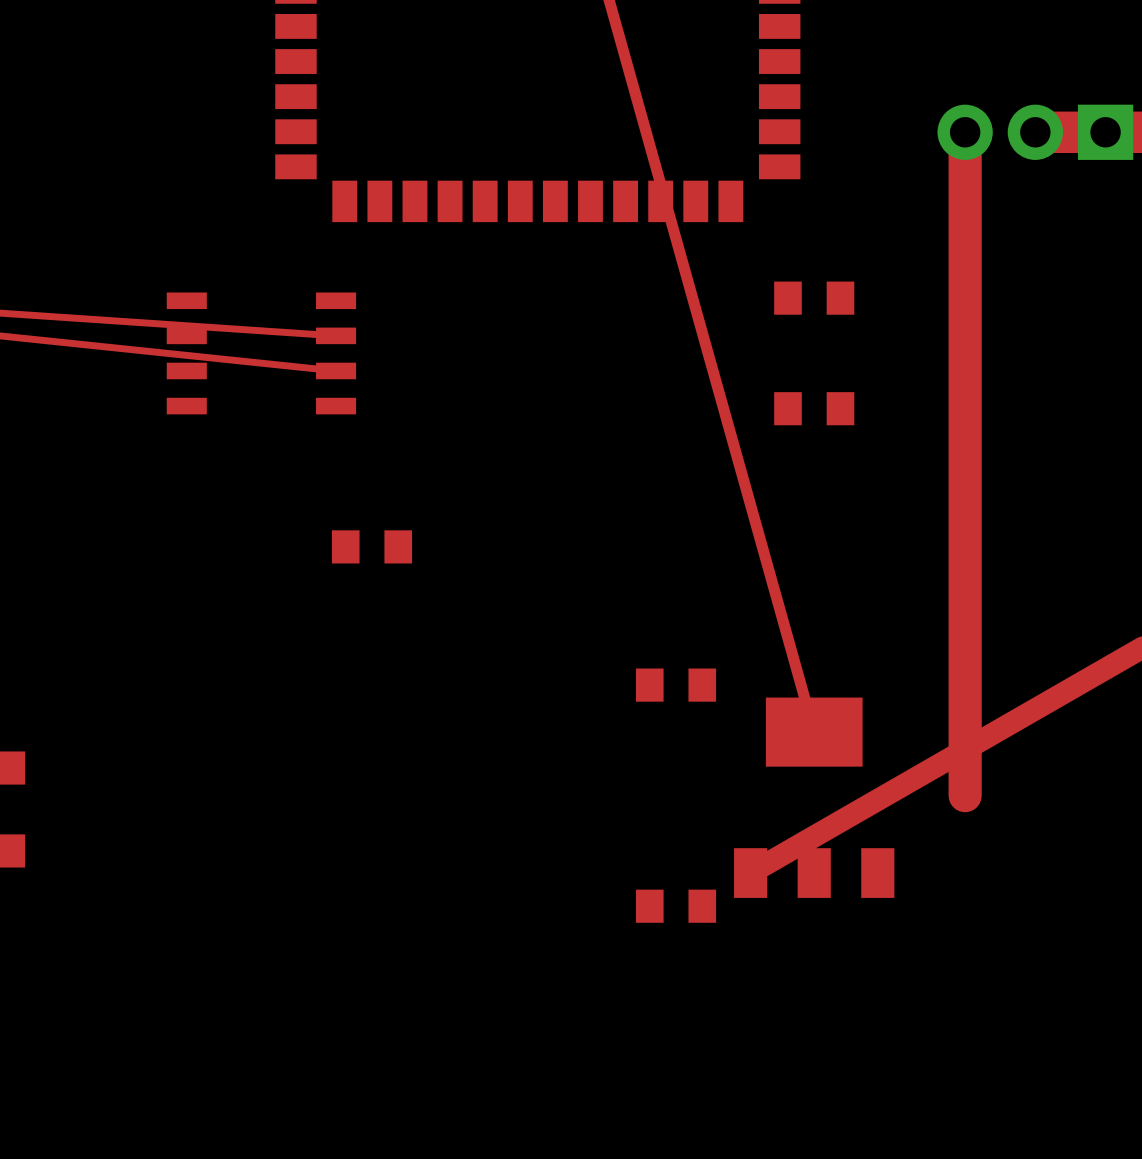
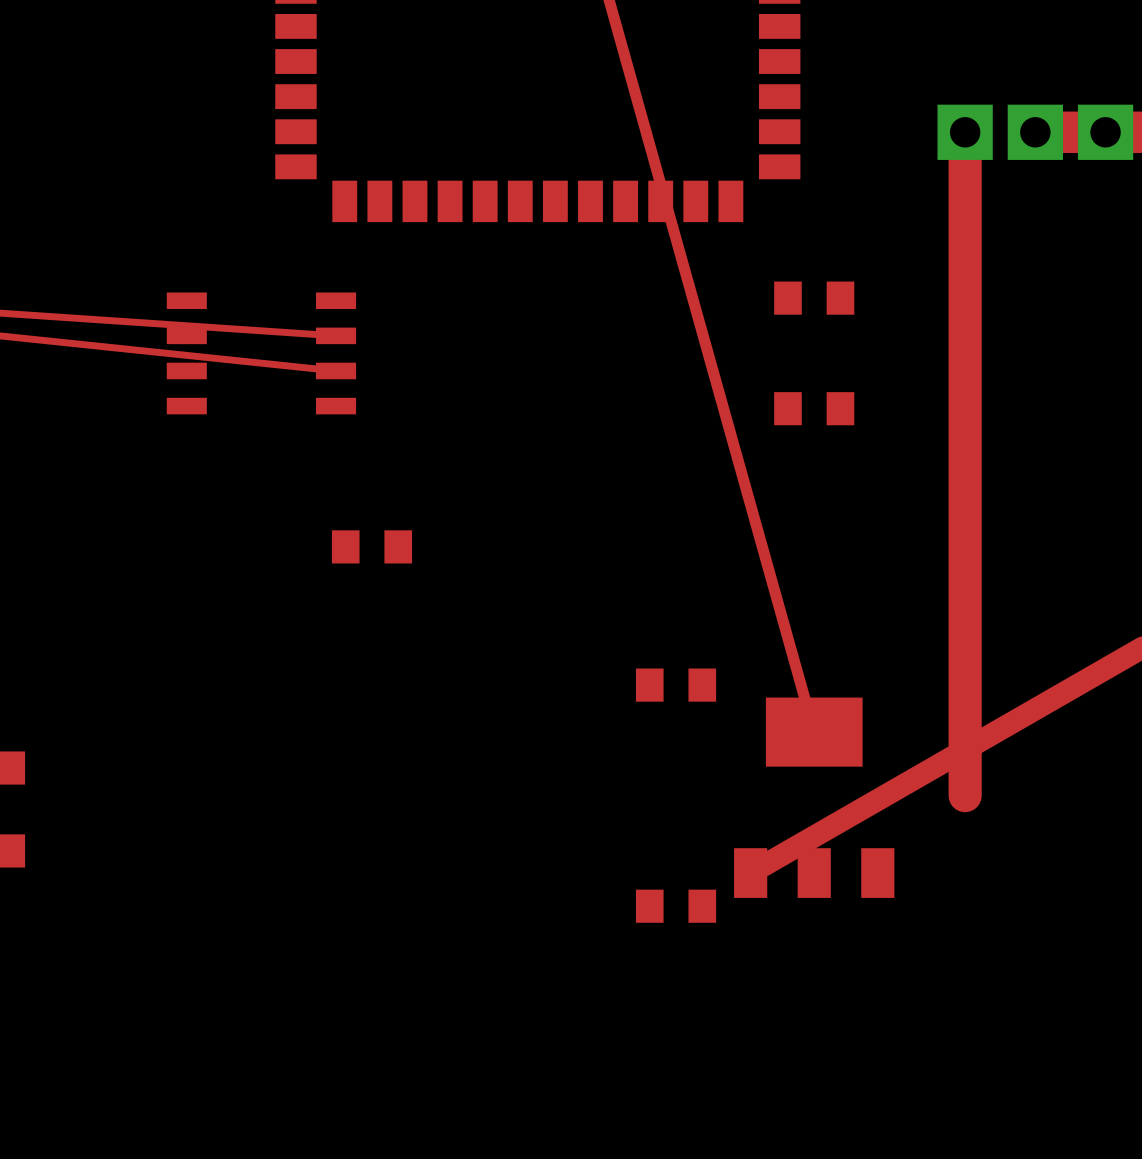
part footprint: [937, 104, 1134, 160] -> [937, 104, 1134, 160]

